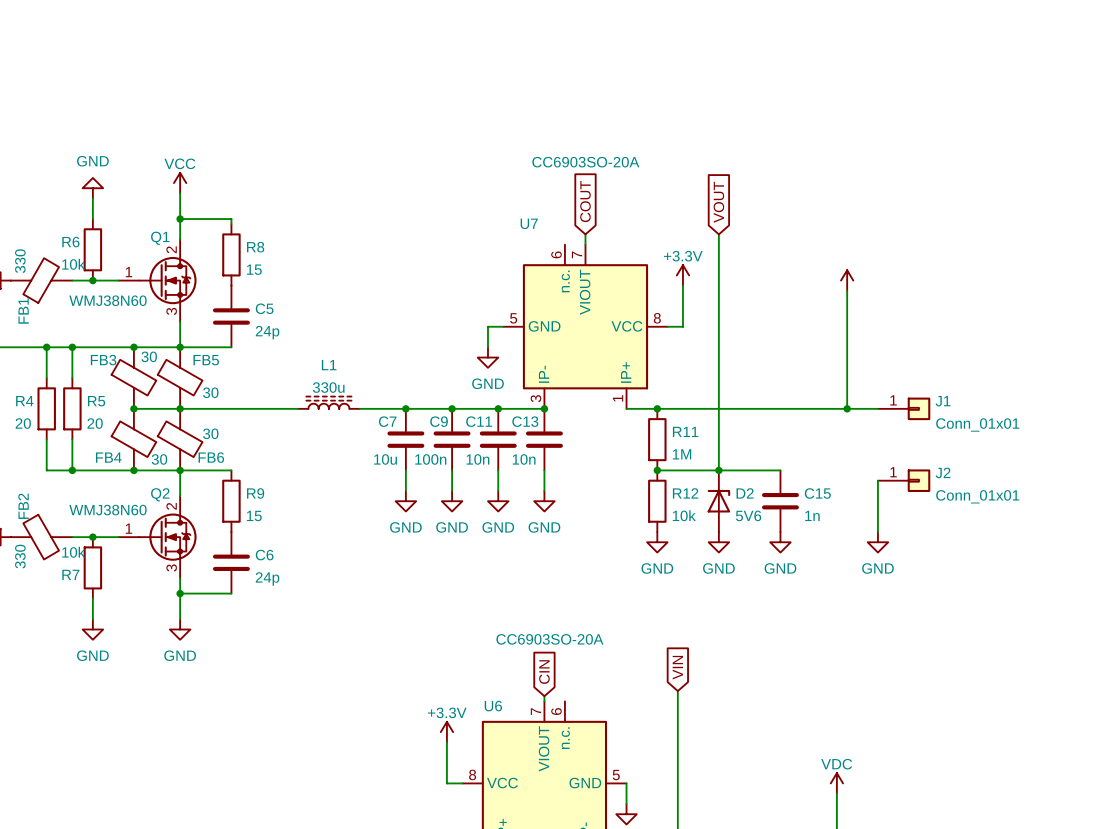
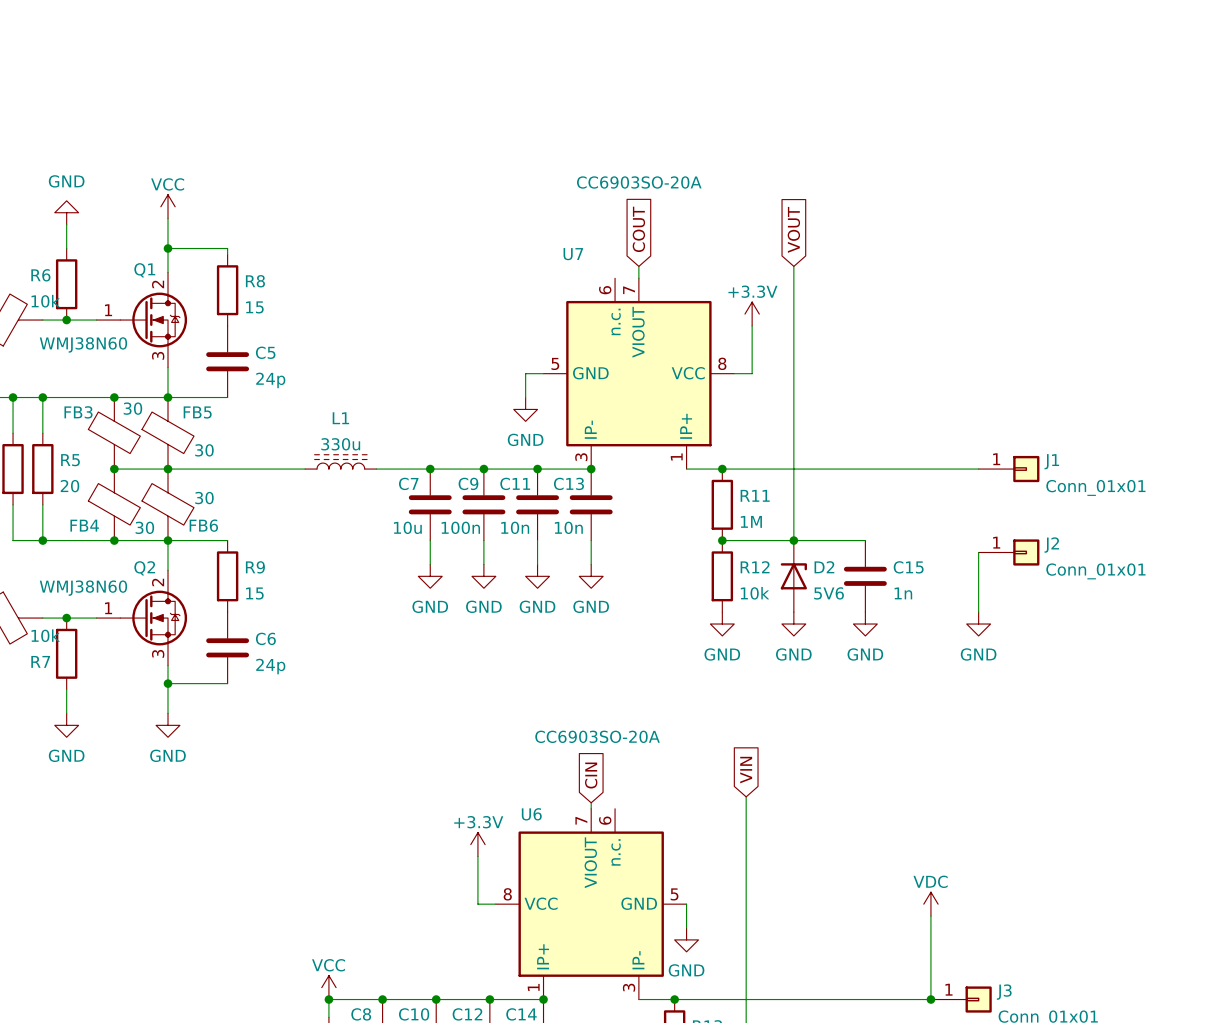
power symbol: (847, 280) -> none
wire: (847, 290) (847, 408) -> none
junction: (847, 408) -> none

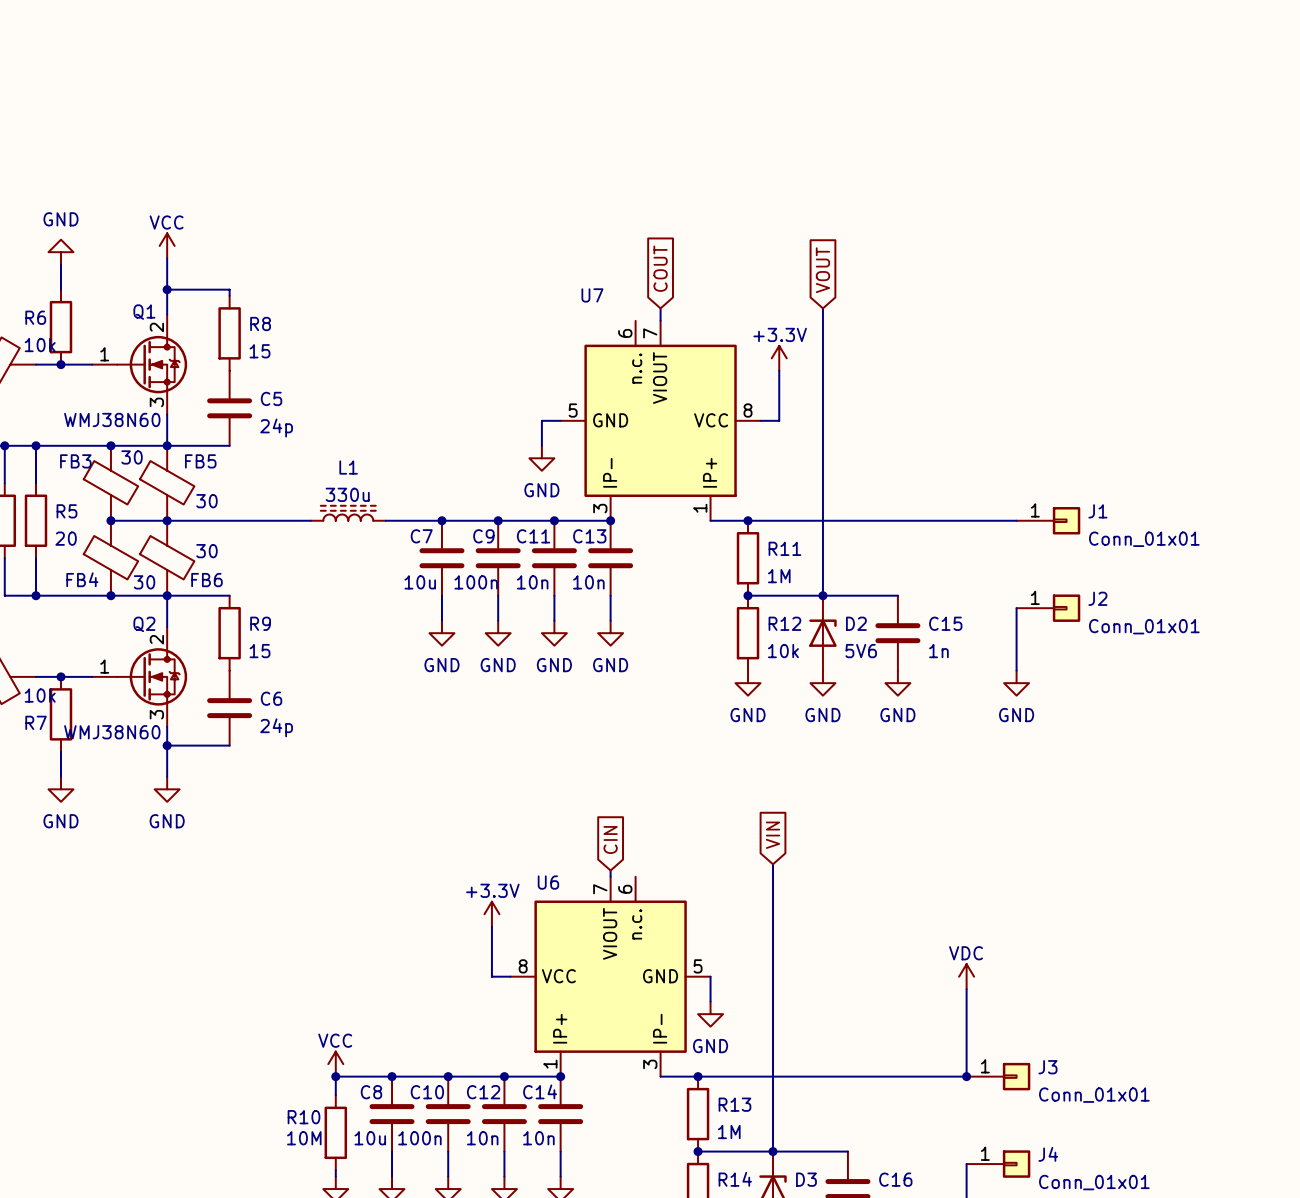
U7 value: CC6903SO-20A (639, 182) -> none
Q1 value position: WMJ38N60 (83, 344) -> WMJ38N60 (112, 419)
Q2 value position: WMJ38N60 (83, 588) -> WMJ38N60 (112, 732)
U6 value: CC6903SO-20A (597, 736) -> none

